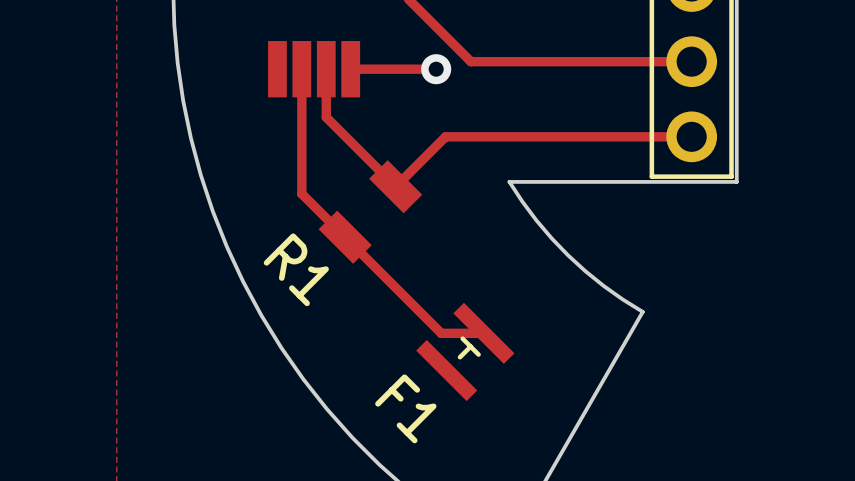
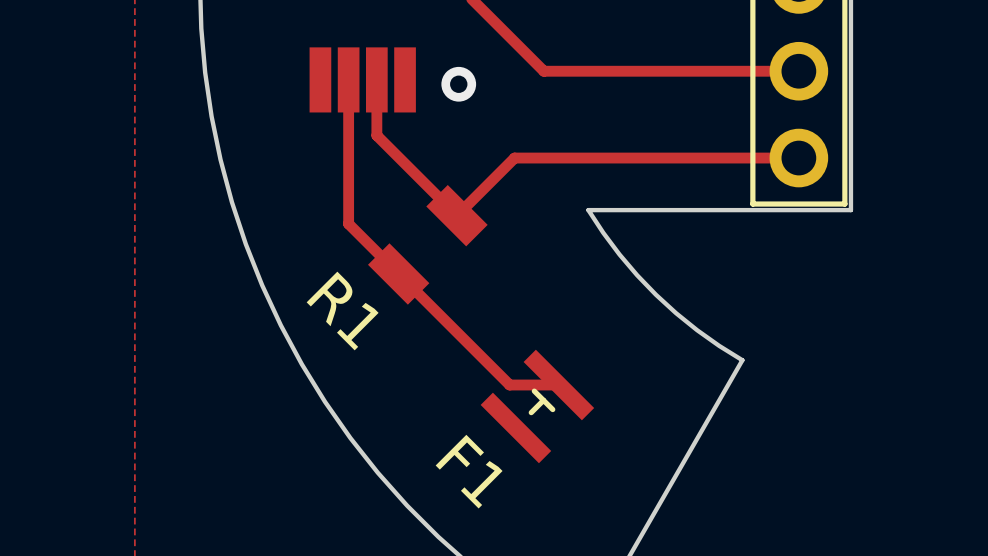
track: (350, 69) (436, 69) -> none
via position: (436, 69) -> (458, 84)

